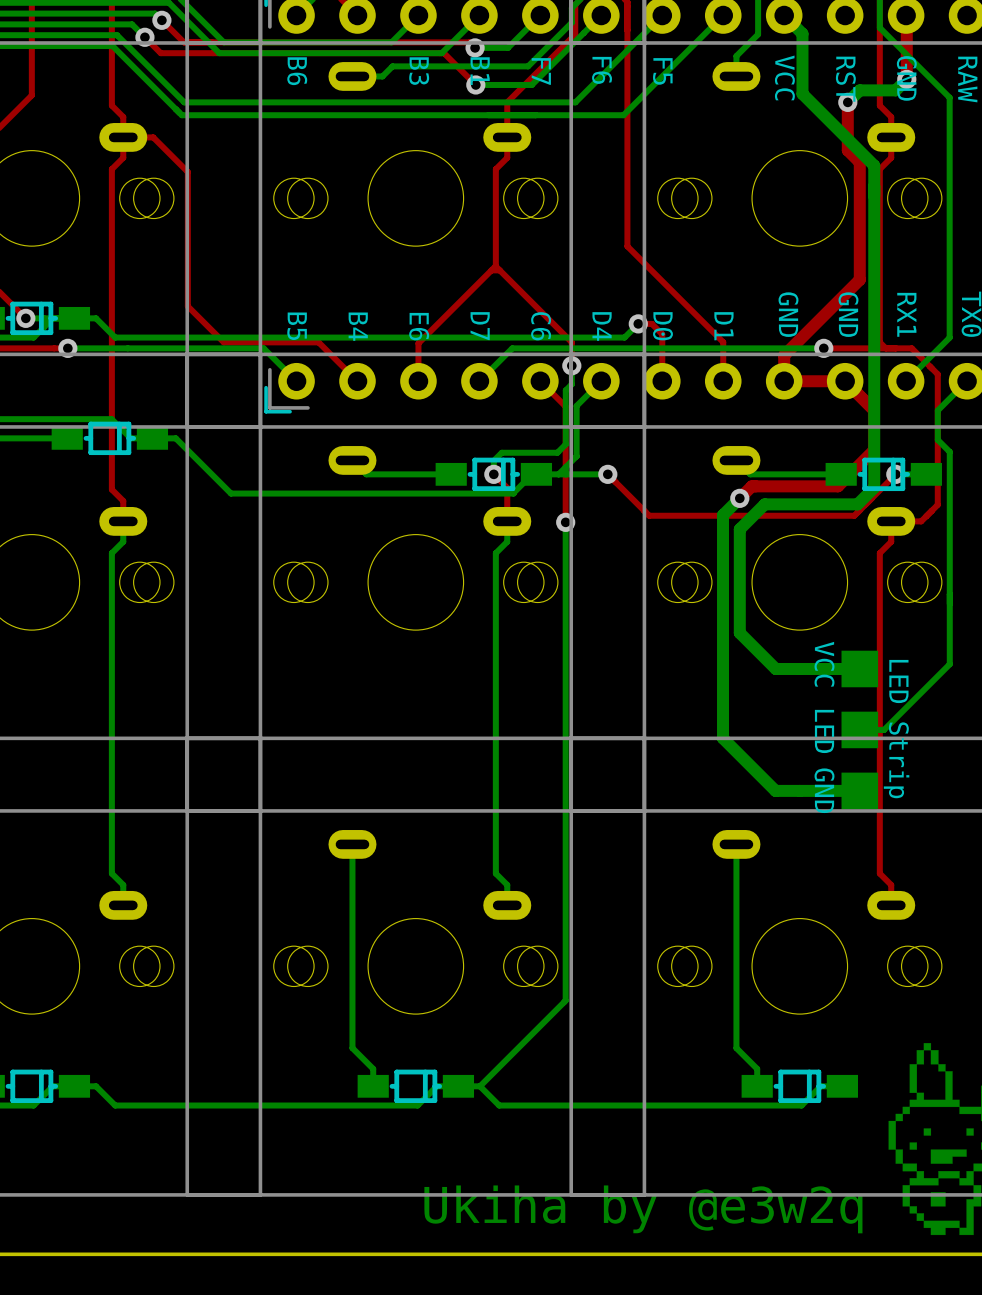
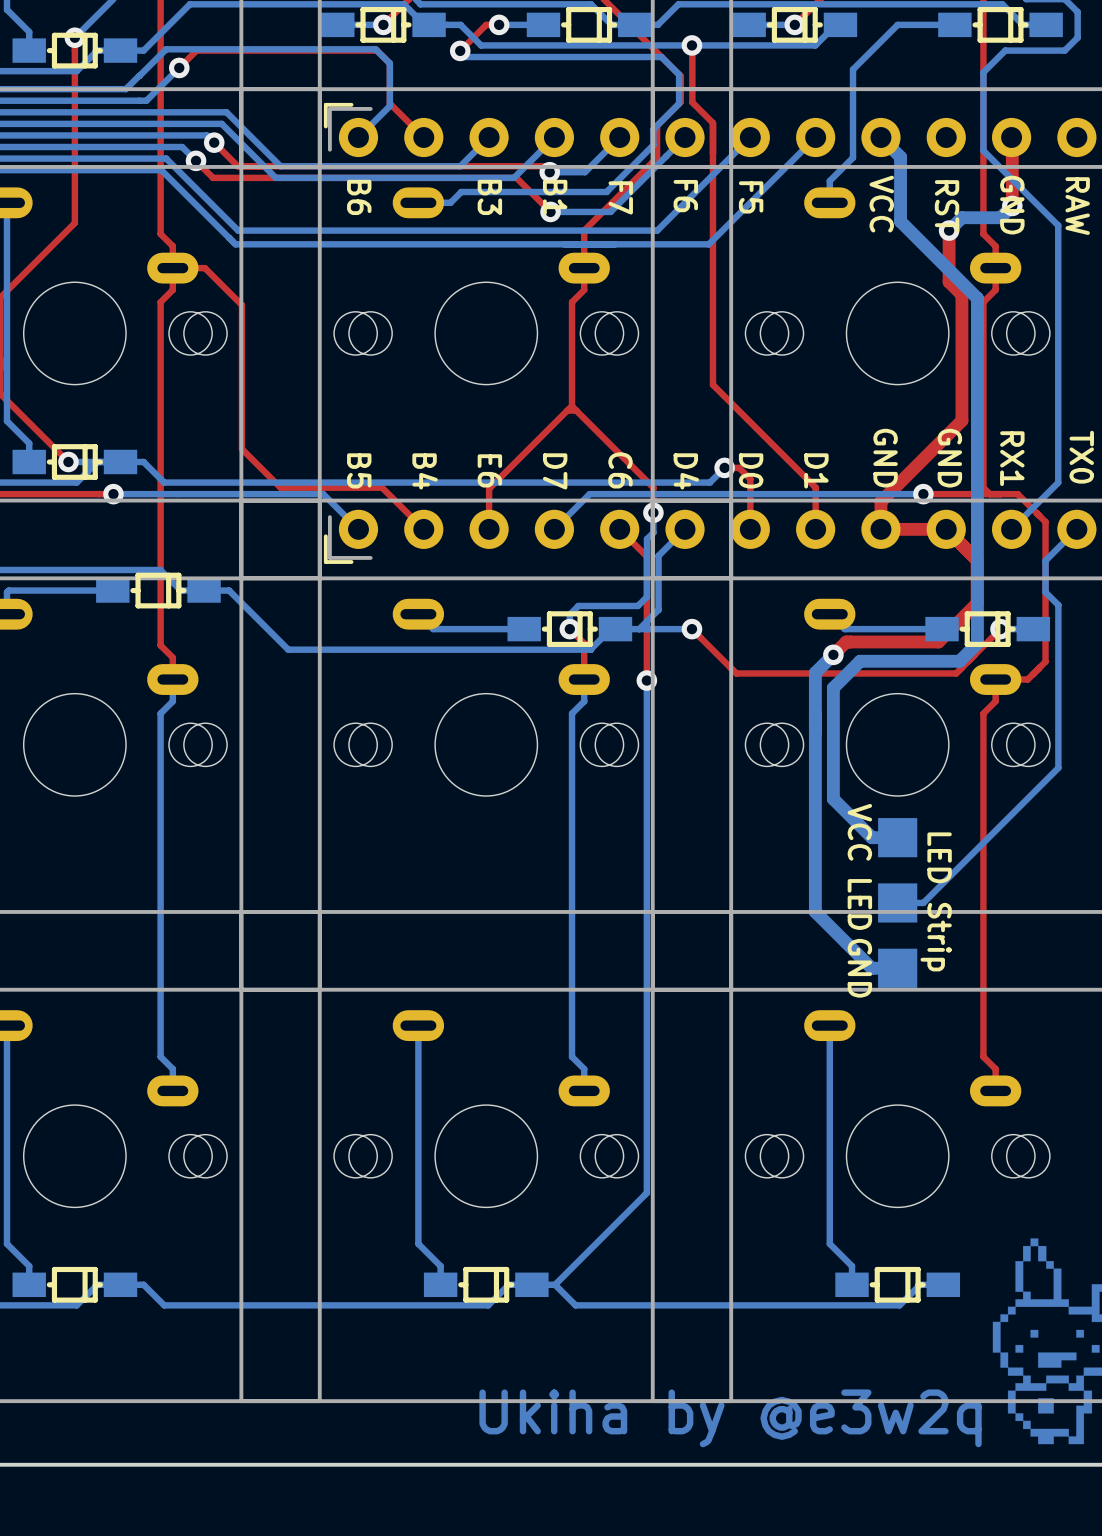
bottom track: (949, 603) (949, 664) (884, 729) (859, 729) -> (1058, 767) (923, 902) (897, 902)
bottom track: (859, 668) (799, 668) -> none
part position: (859, 729) -> (897, 902)
bottom track: (859, 790) (799, 790) -> none

